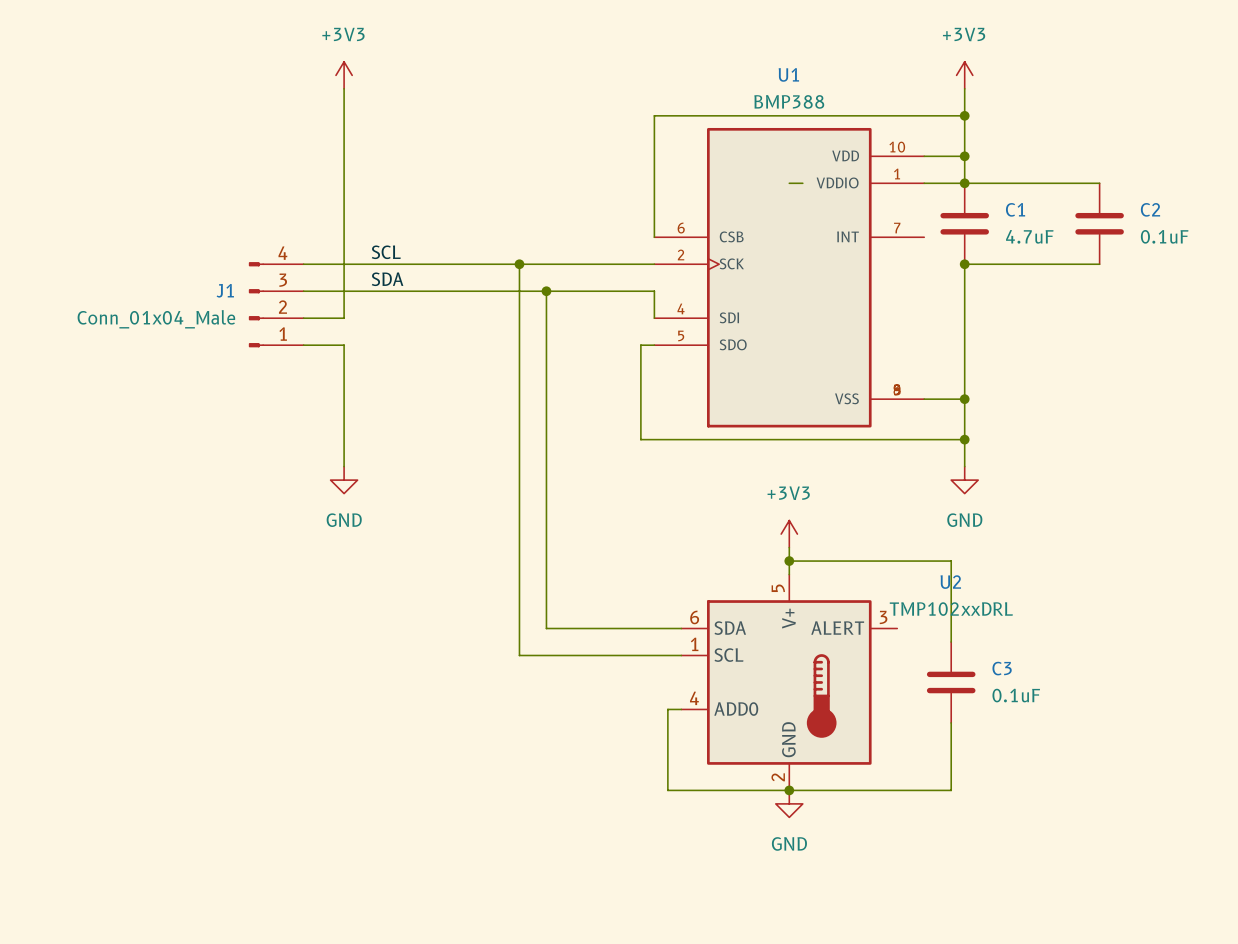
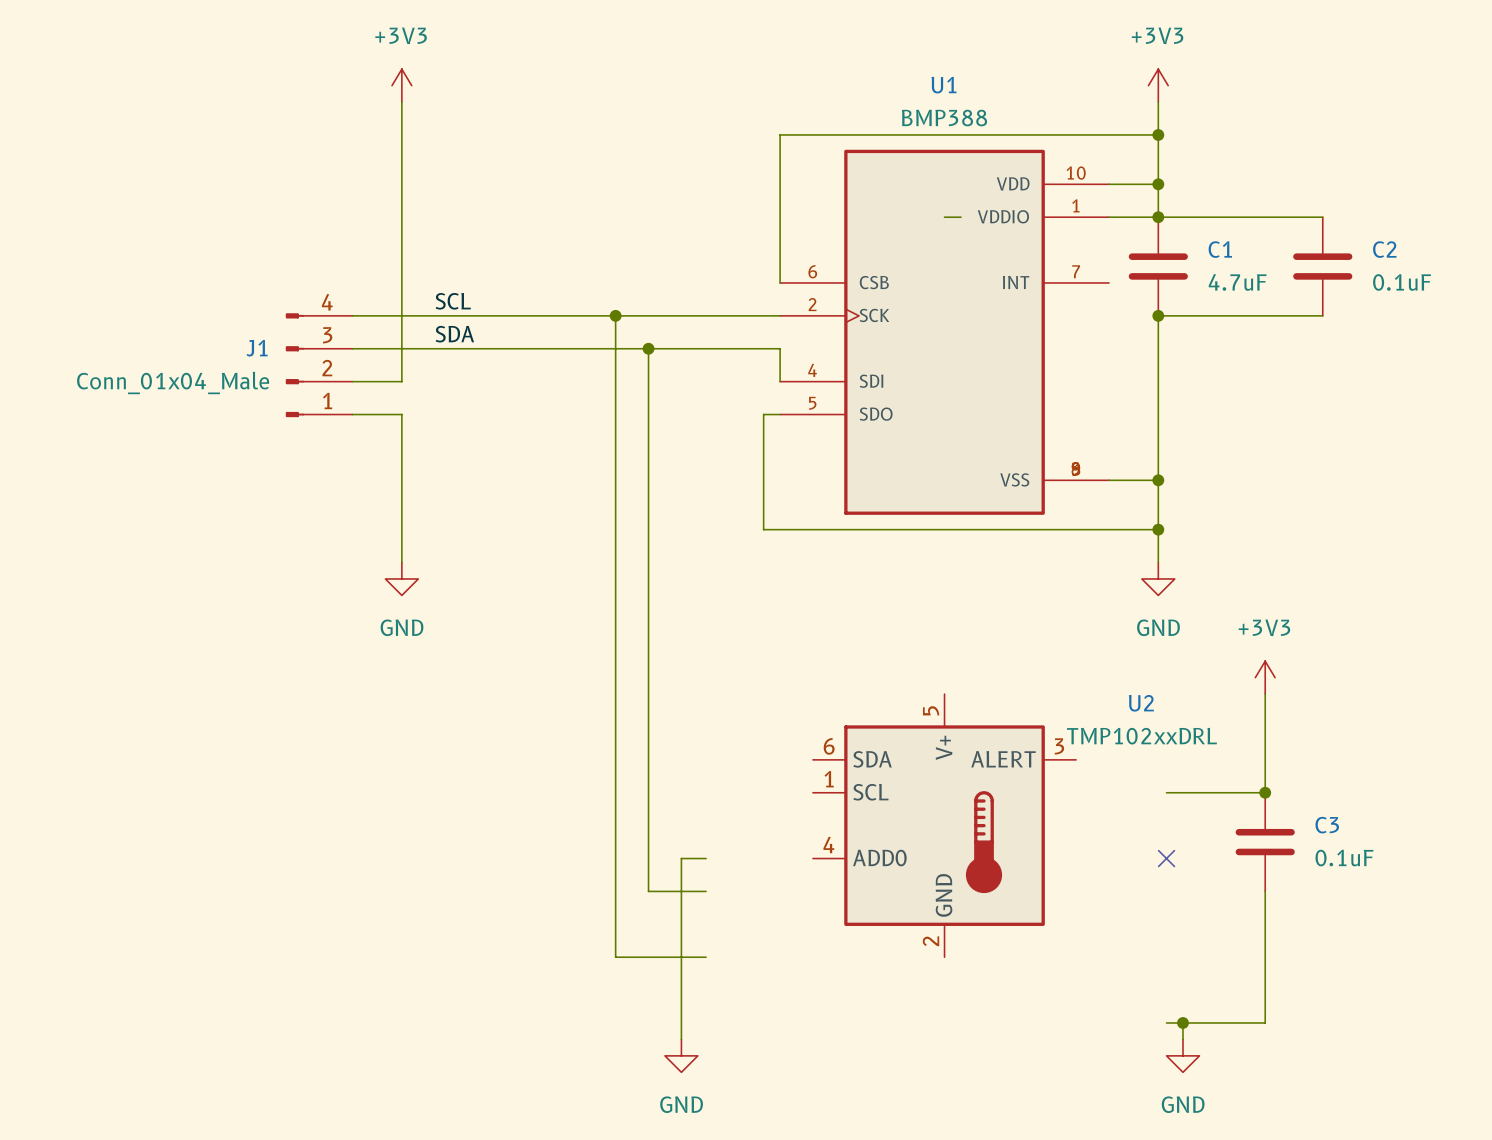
power symbol position: +3V3 (789, 534) -> +3V3 (1265, 677)
wire: (789, 547) (789, 574) -> none
wire: (789, 561) (951, 561) (951, 642) -> none
junction: (789, 561) -> none
wire: none -> (1265, 694) (1265, 792) (1166, 792)
wire: (546, 628) (681, 628) -> (648, 759) (648, 891) (706, 891)
wire: (519, 655) (681, 655) -> (615, 792) (615, 957) (706, 957)
junction: none -> (1265, 792)
C3 position: (951, 682) -> (1265, 842)
wire: none -> (706, 858) (681, 858) (681, 1039)
wire: (681, 709) (667, 709) (667, 790) (951, 790) (951, 722) -> none
no-connect mark: none -> (1166, 858)
wire: none -> (1265, 891) (1265, 1022) (1166, 1022)
junction: (789, 790) -> none
power symbol: GND (789, 803) -> none
wire: none -> (1182, 1022) (1182, 1039)
junction: none -> (1182, 1022)
power symbol: none -> GND (681, 1055)
power symbol: none -> GND (1182, 1055)

